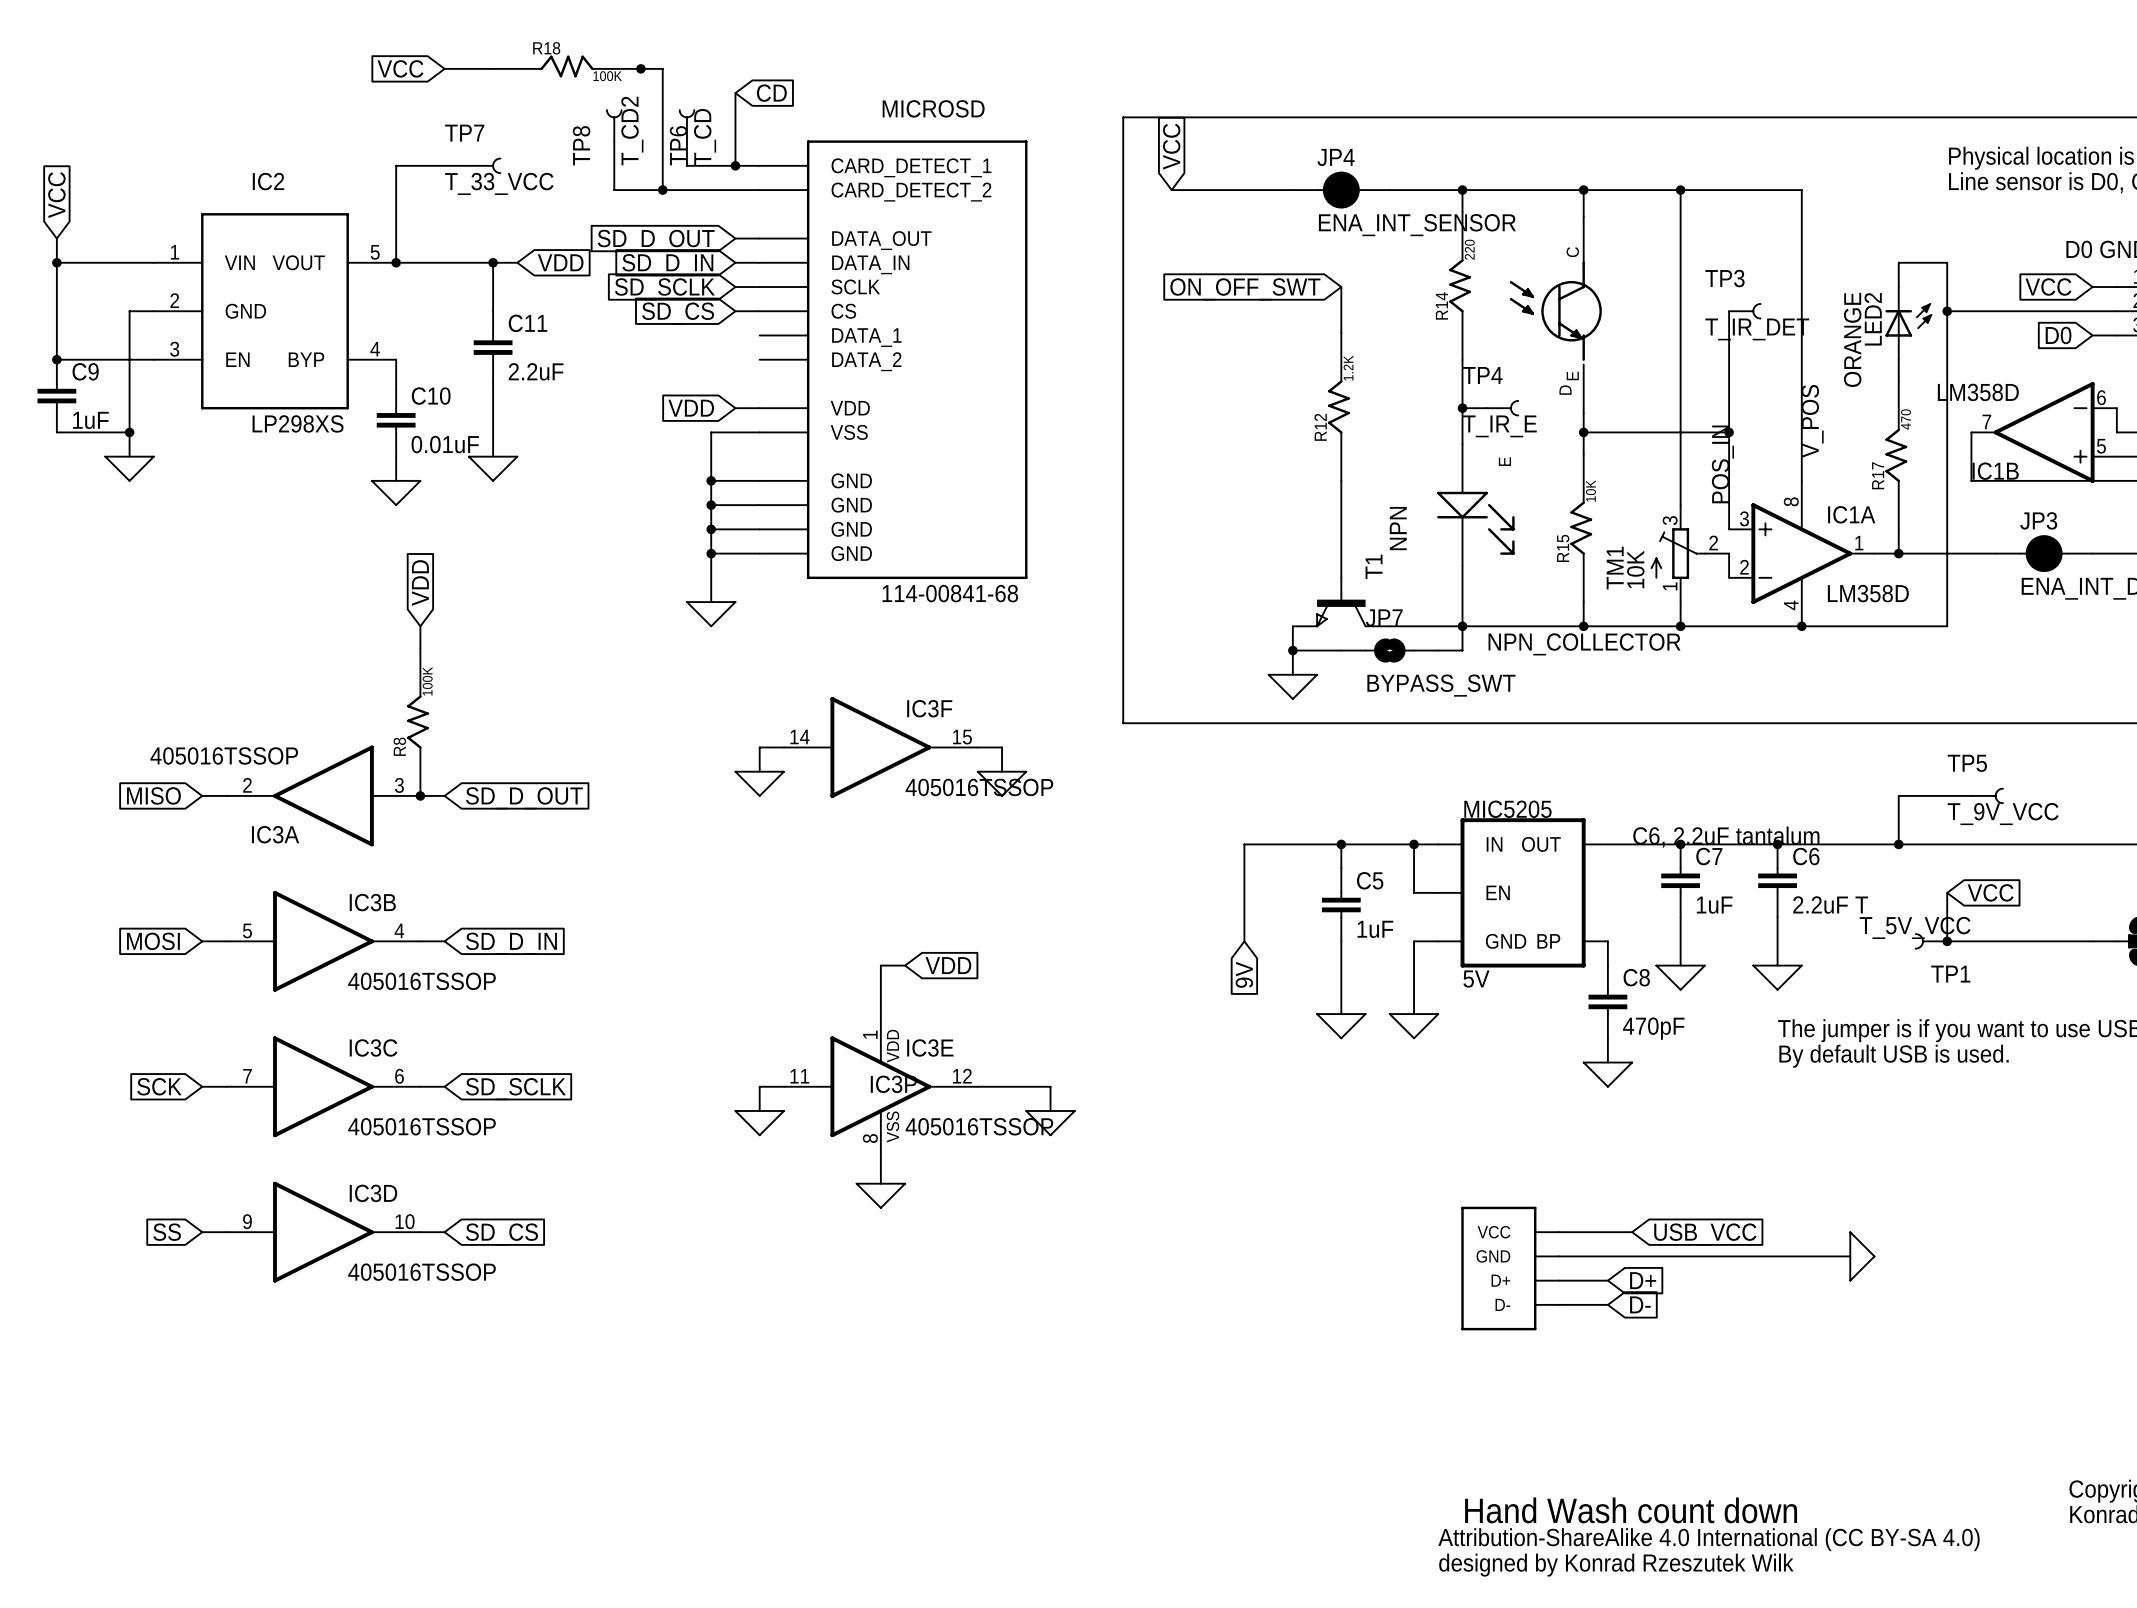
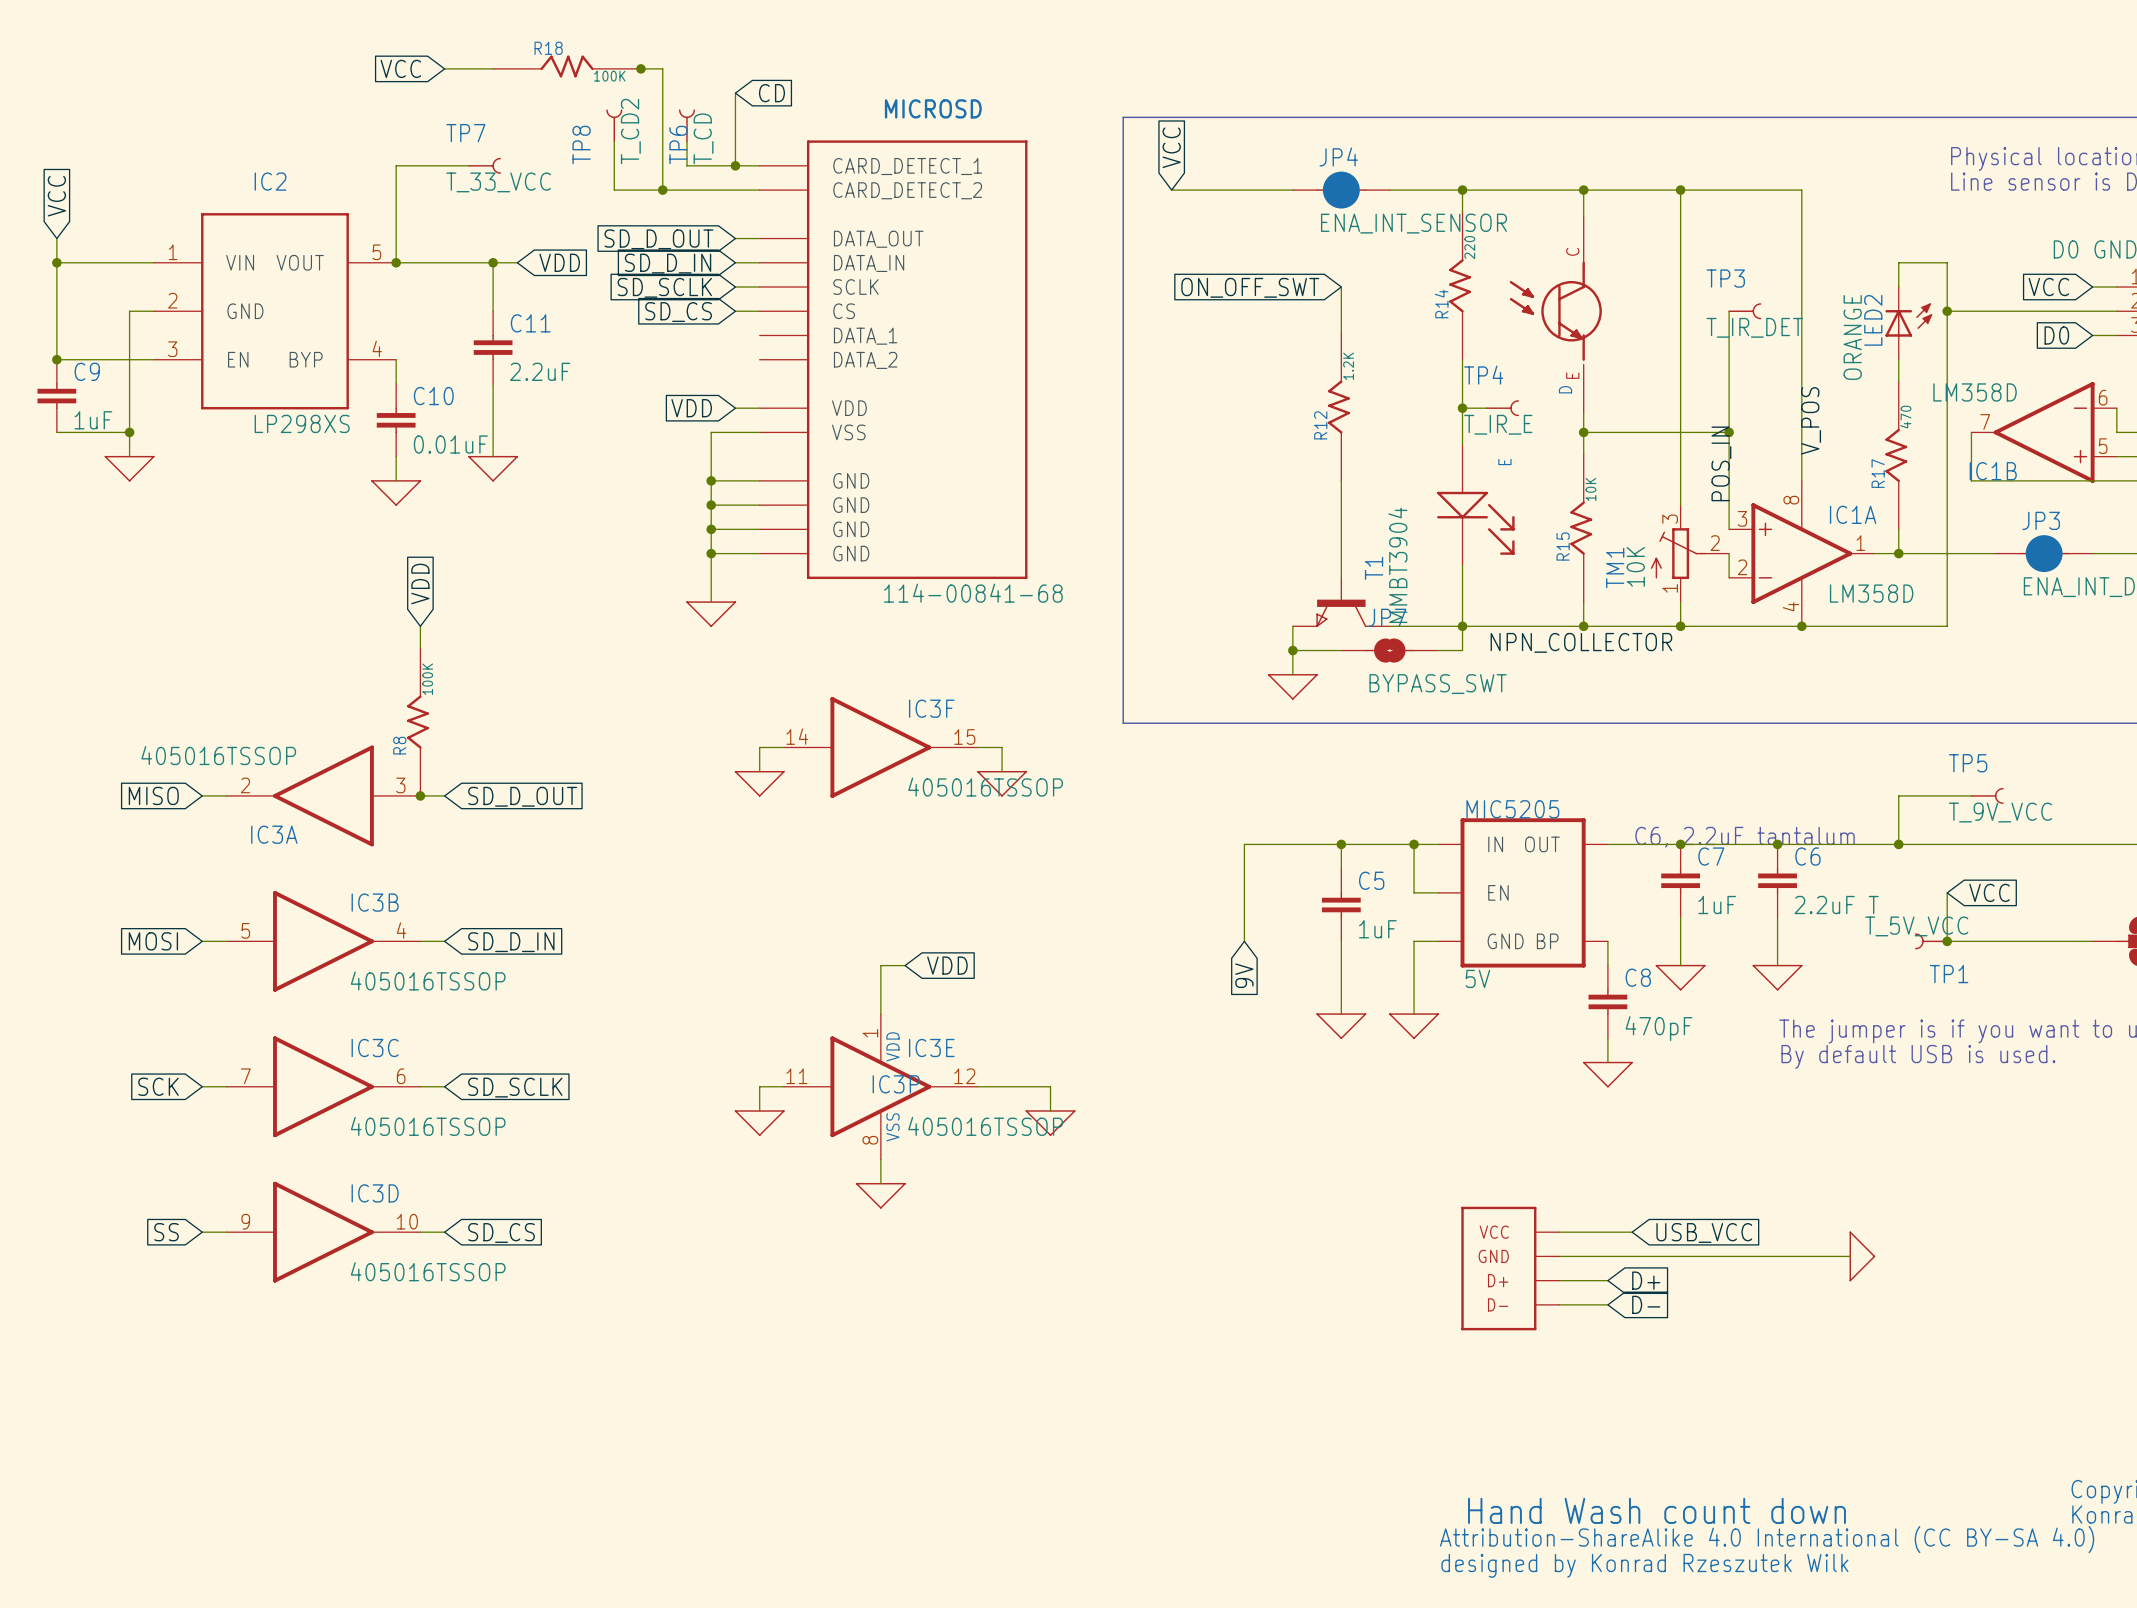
T1 value: NPN (1398, 528) -> MMBT3904 (1397, 565)

